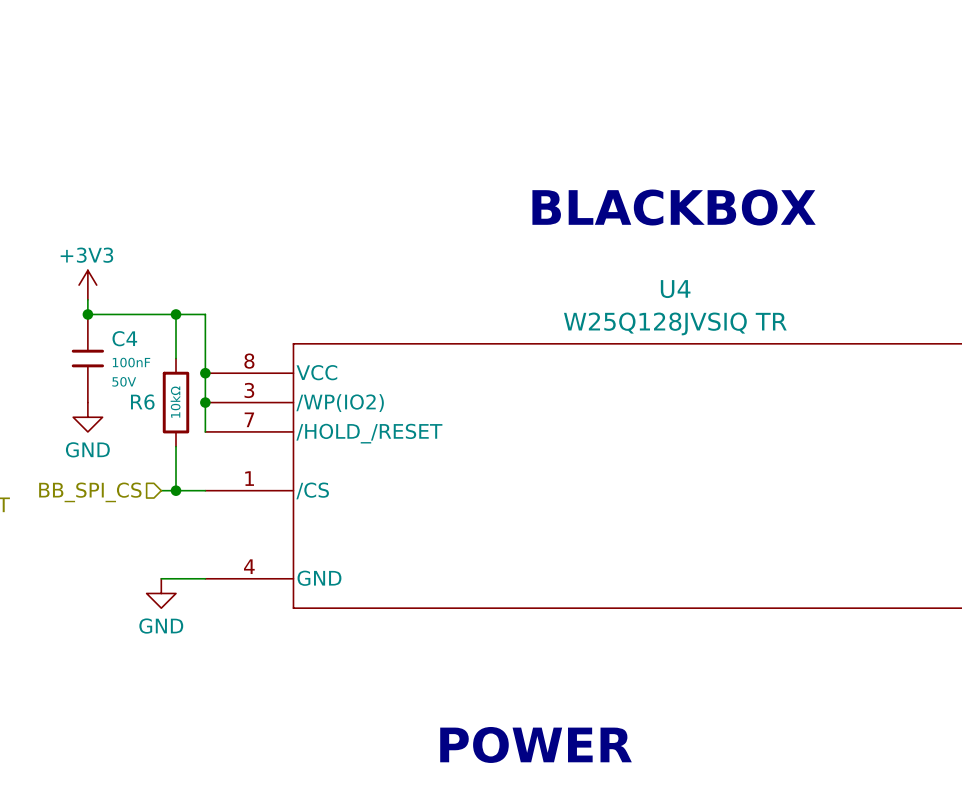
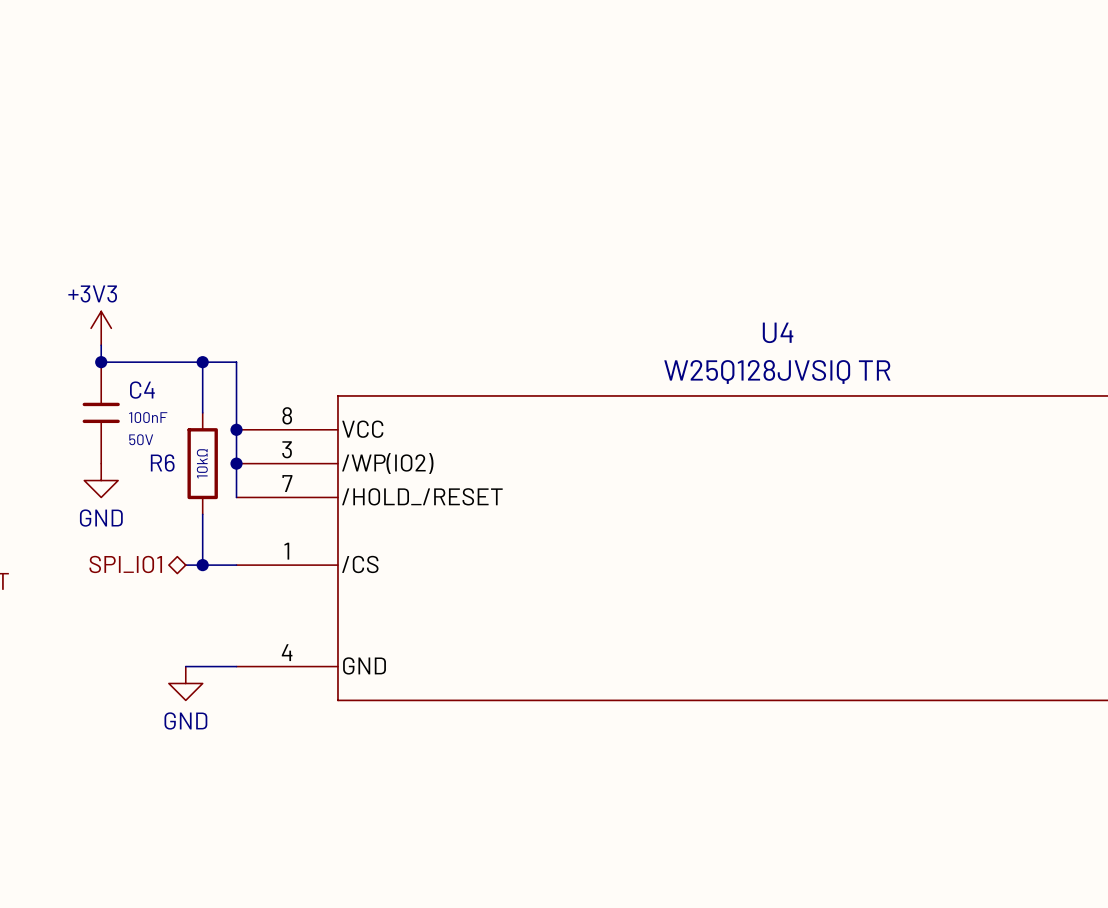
text: BLACKBOX (674, 207) -> none
hierarchical label shape: input (90, 492) -> bidirectional (125, 564)
hierarchical label: BB_SPI_CS (90, 492) -> SPI_IO1 (125, 564)
text: POWER (536, 744) -> none

